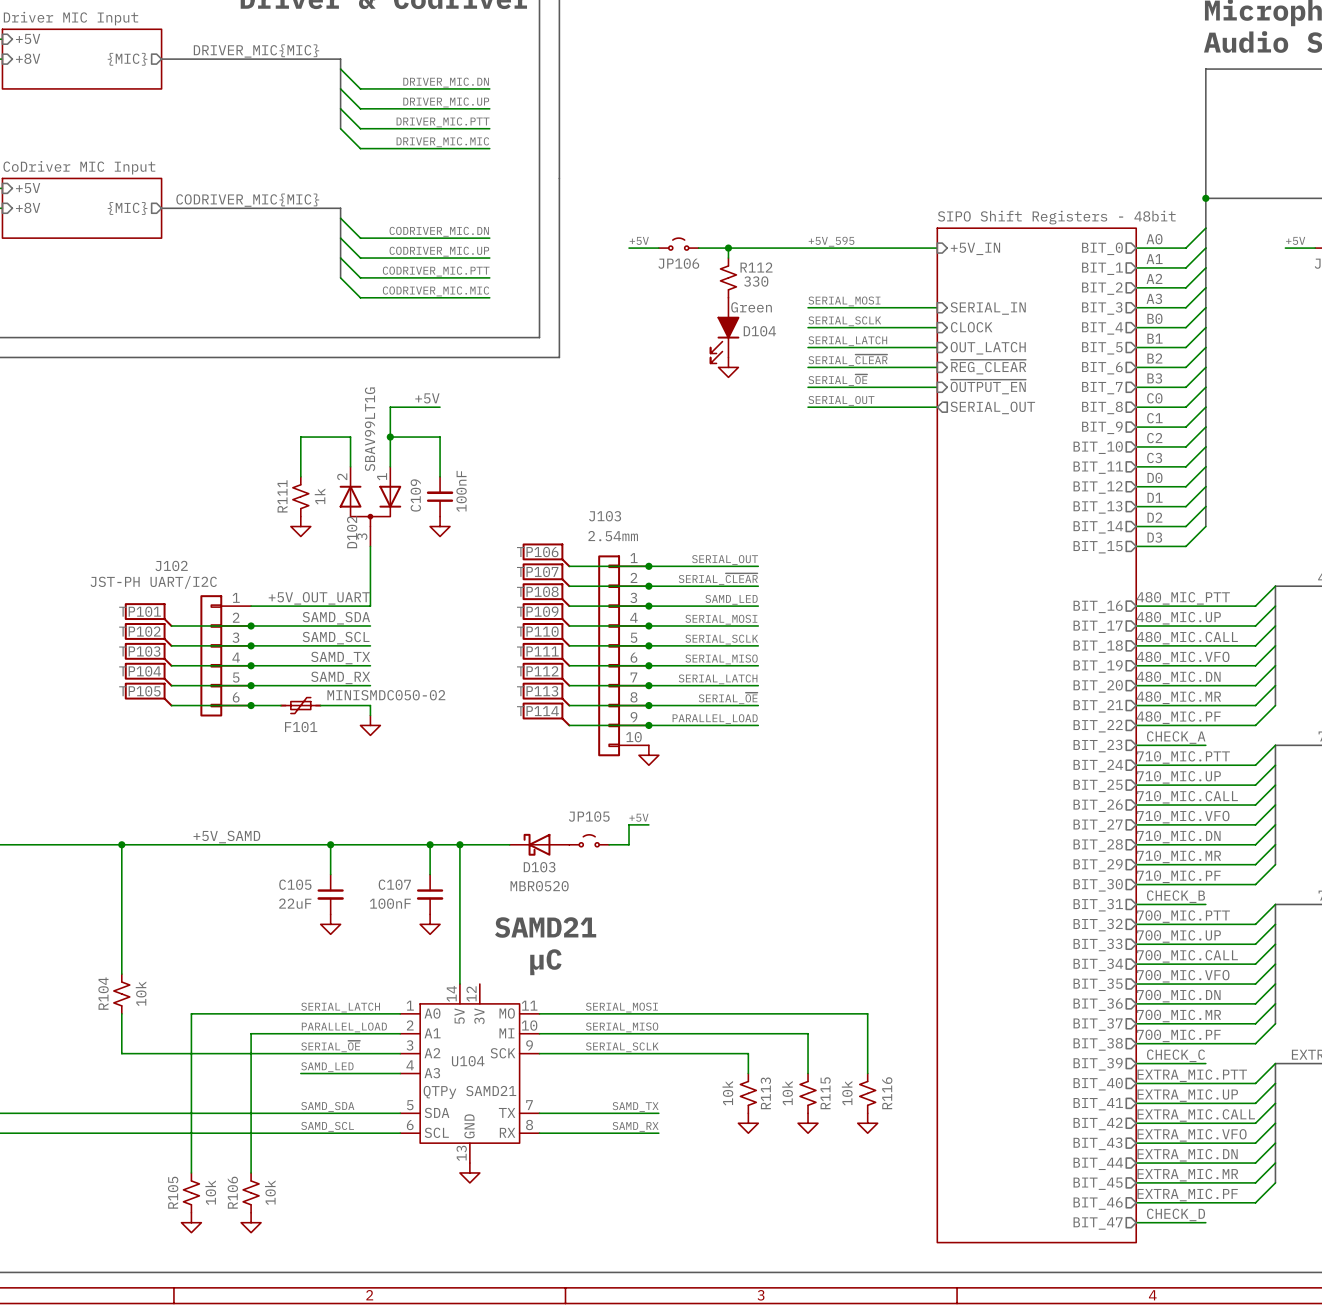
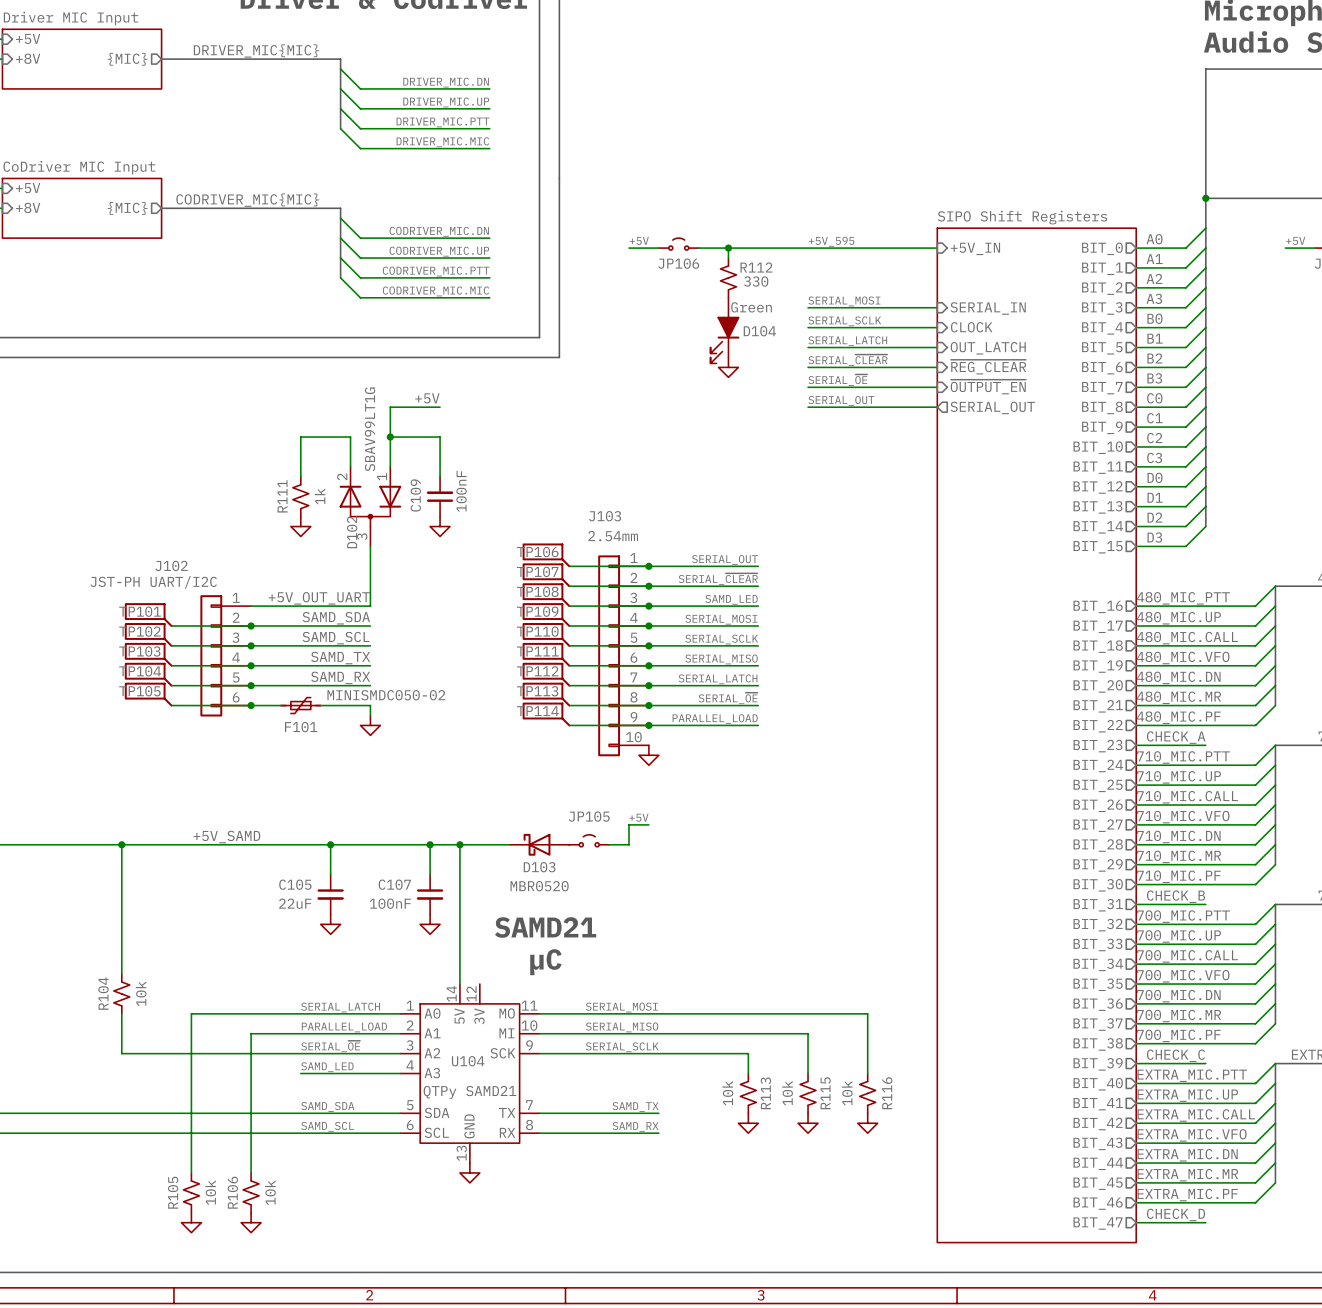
sheet SIPO Shift Registers - 48bit name: SIPO Shift Registers - 48bit (1056, 217) -> SIPO Shift Registers (1022, 217)

